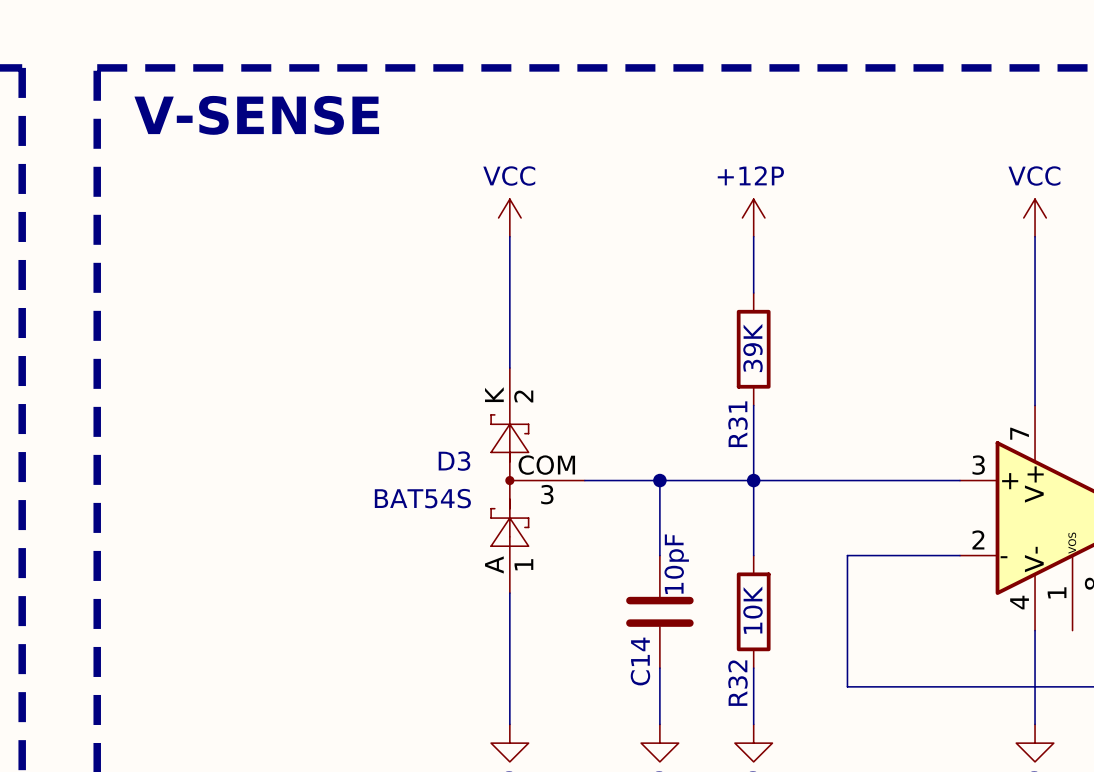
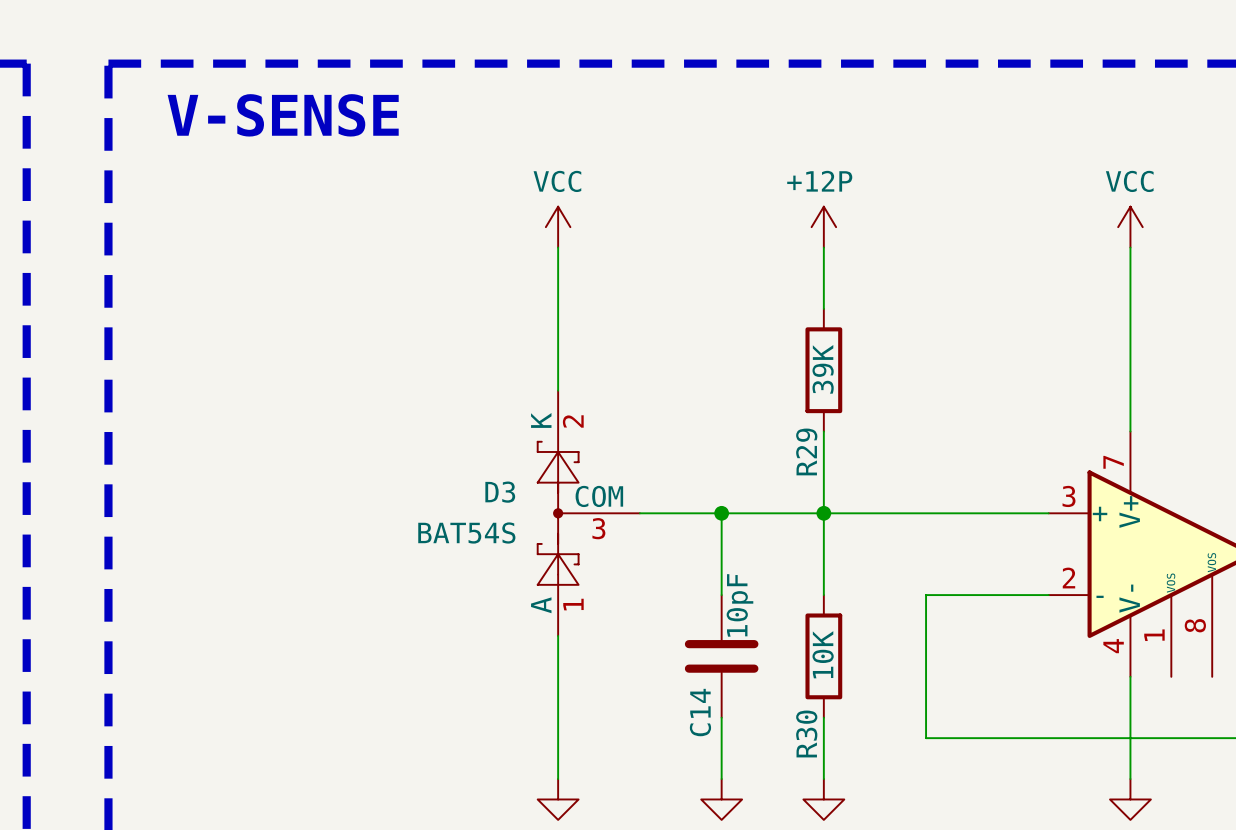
R31 name: R31 (737, 424) -> R29 (806, 451)
R32 name: R32 (737, 683) -> R30 (806, 733)

